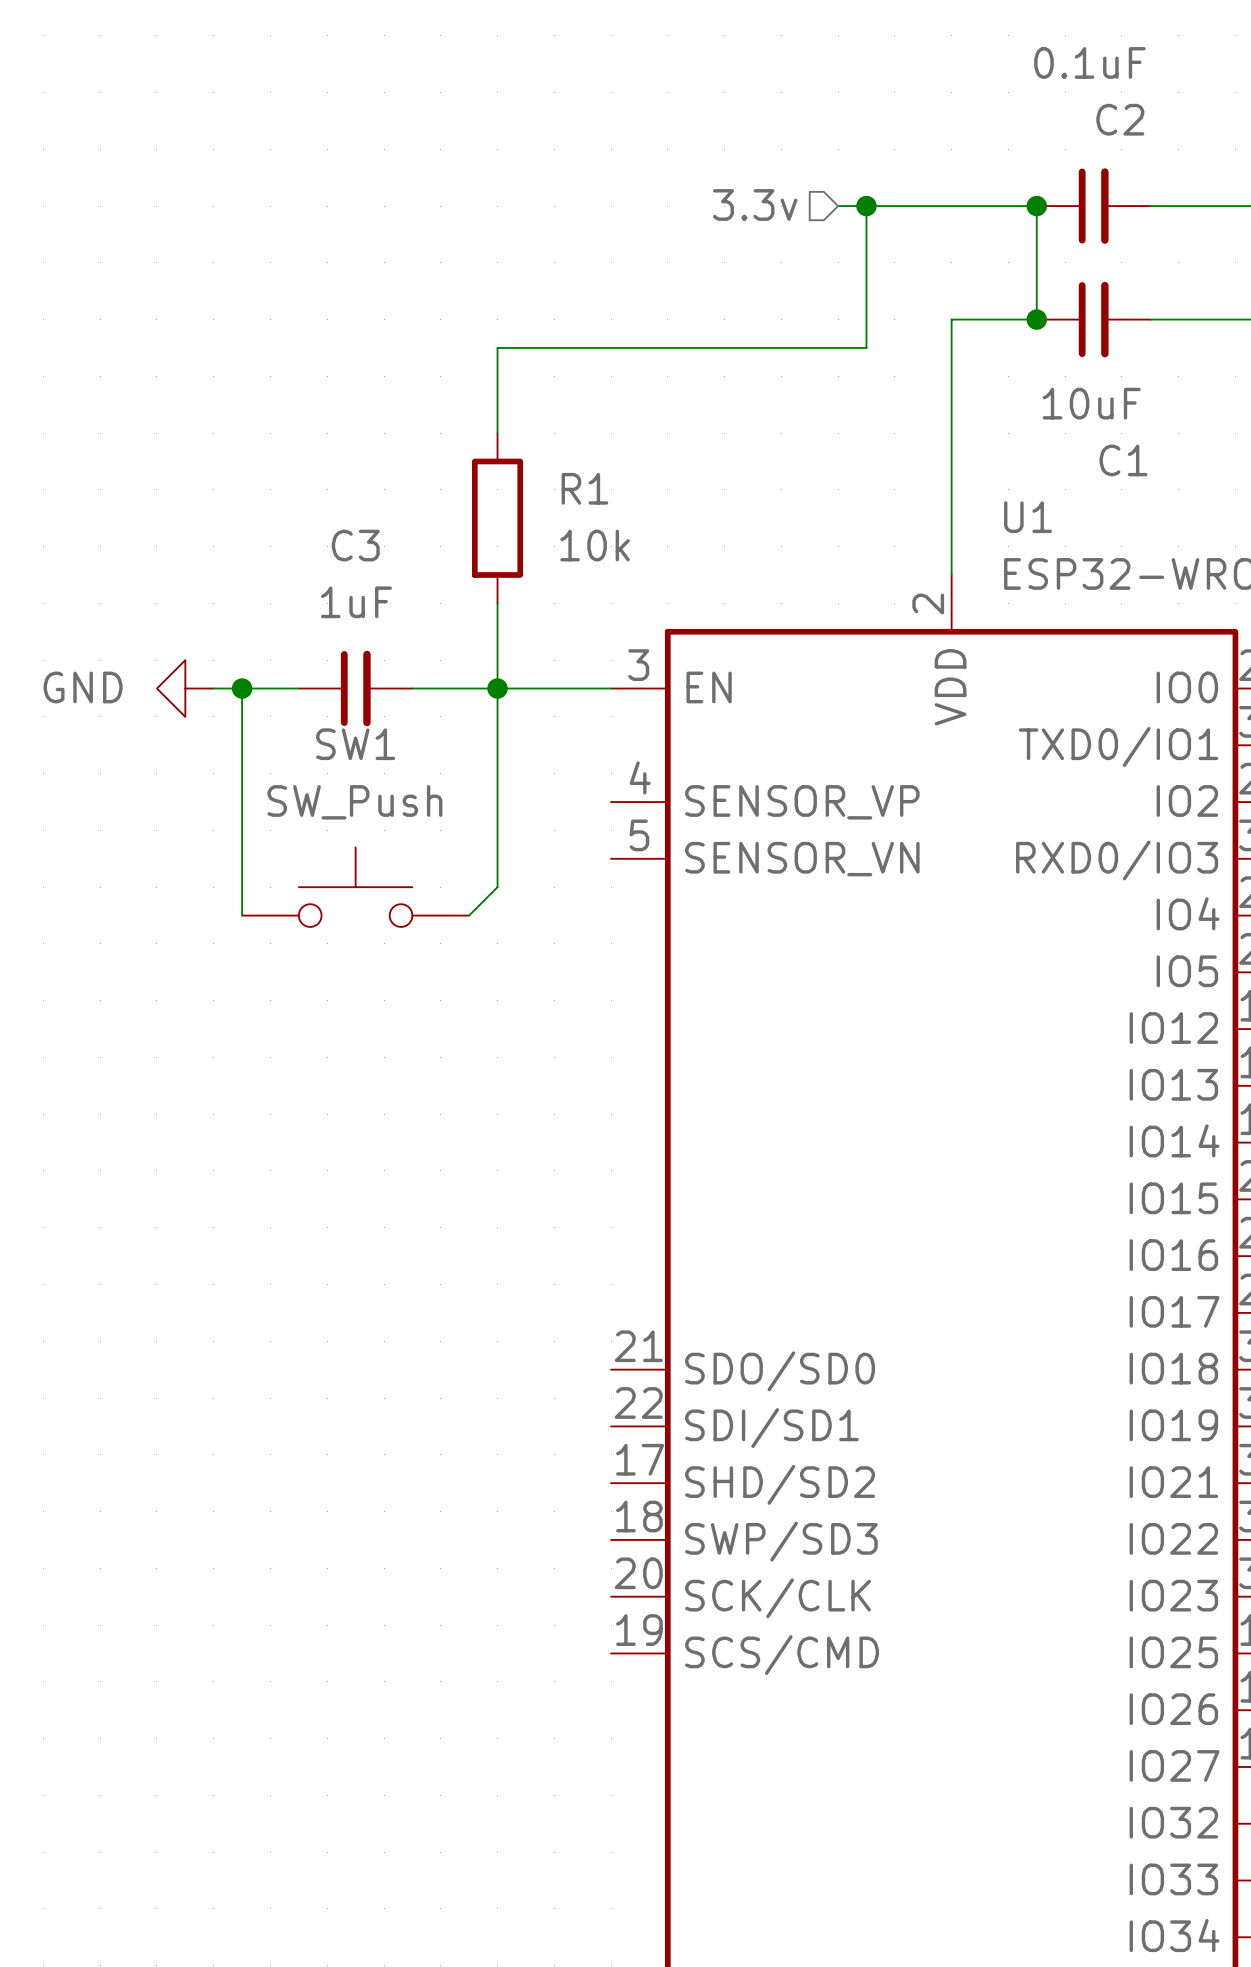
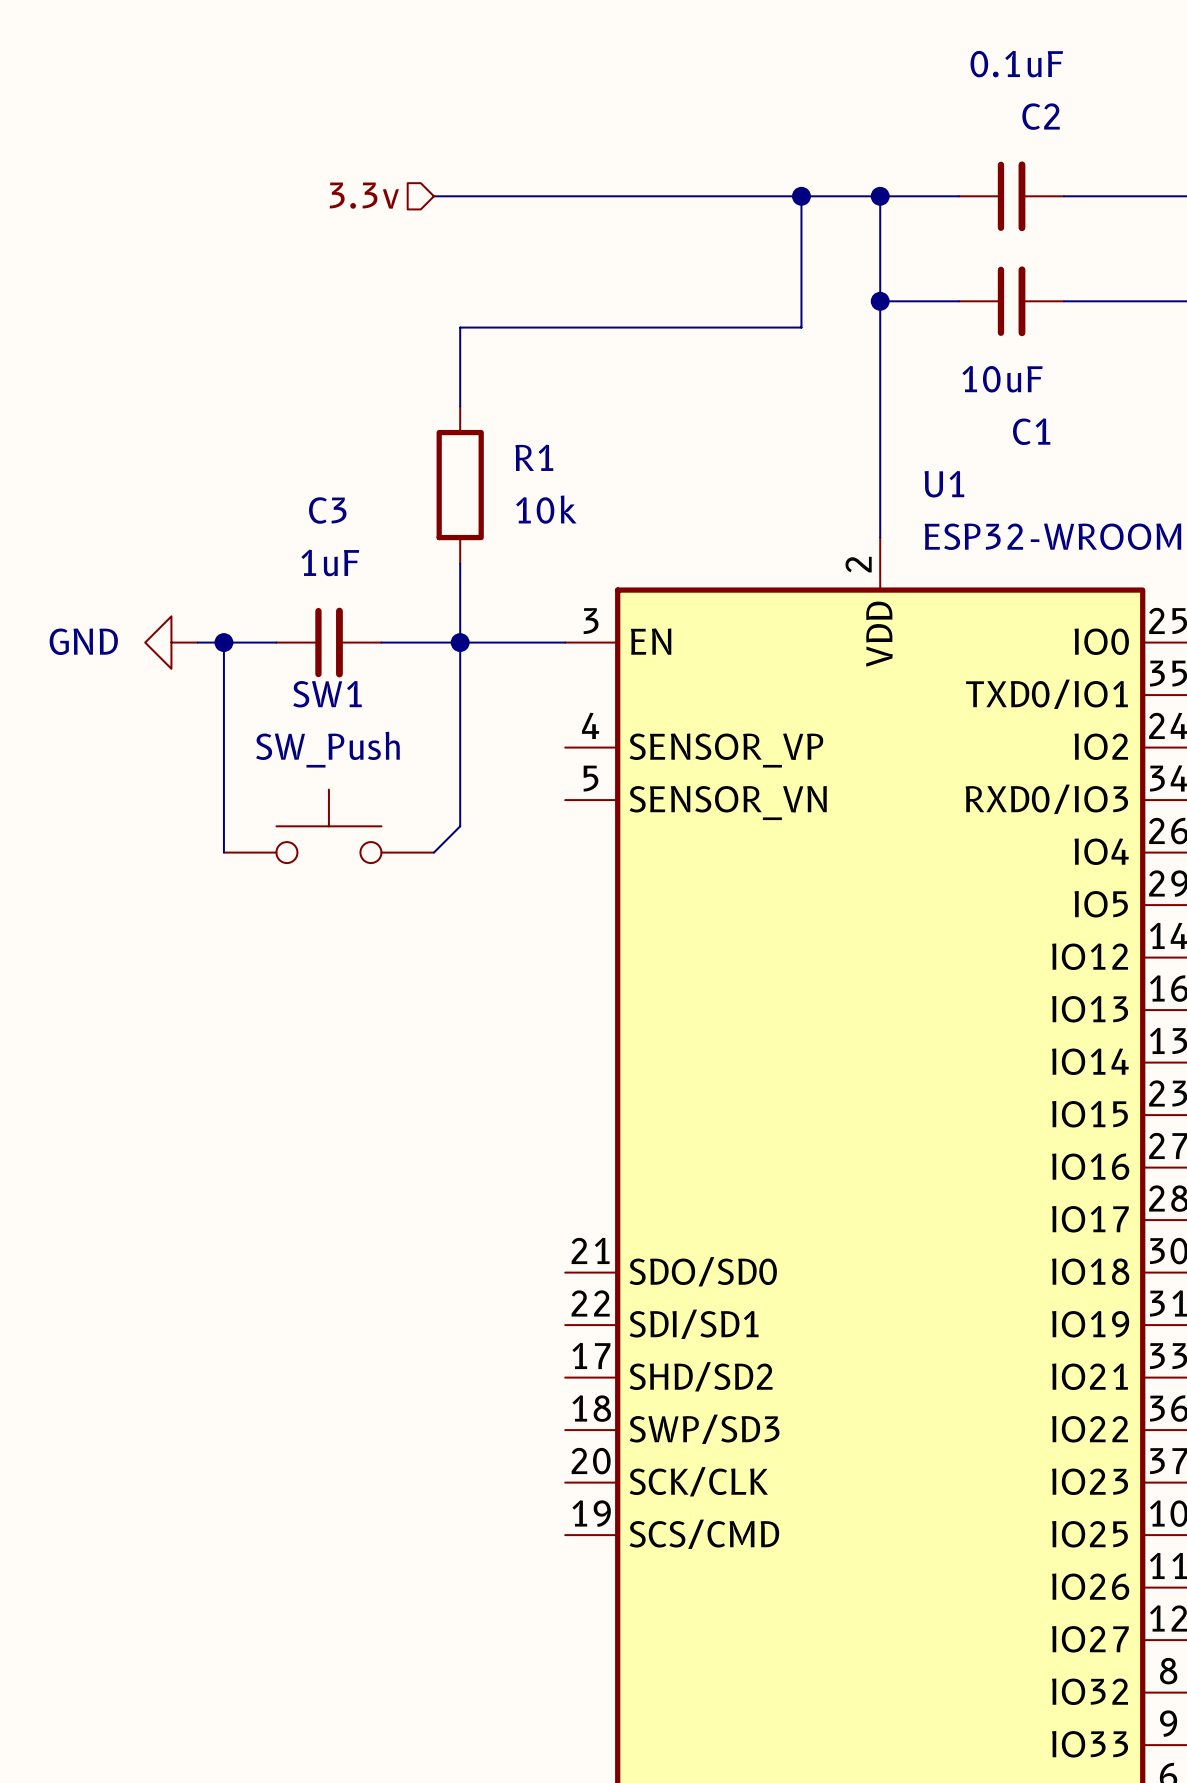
hierarchical label position: 3.3v (755, 204) -> 3.3v (364, 195)
wire: none -> (433, 196) (775, 196)
junction: none -> (880, 196)
wire: (1036, 206) (1036, 319) -> (880, 196) (880, 301)
junction: (1036, 206) -> none
junction: none -> (880, 301)
junction: (1036, 319) -> none

